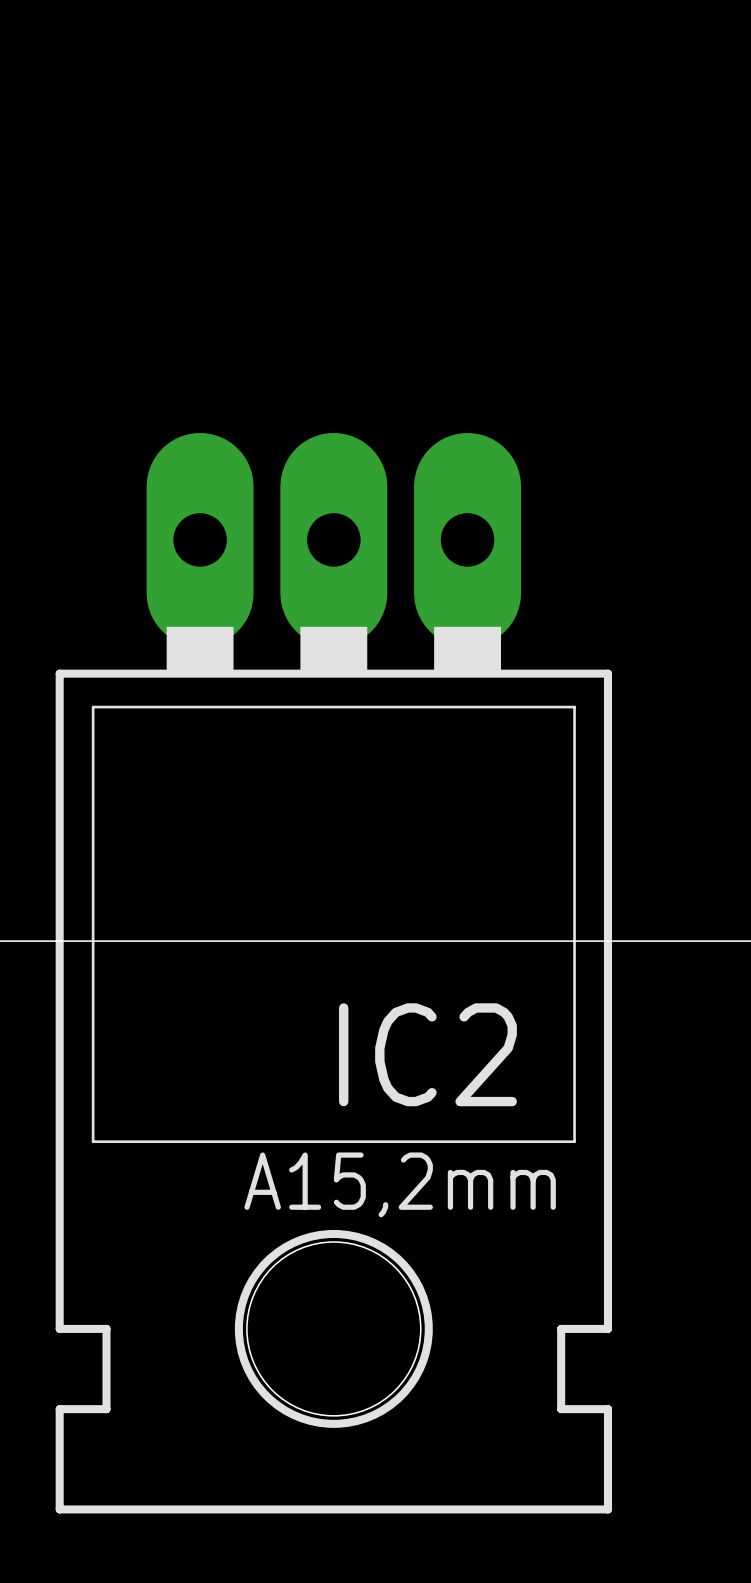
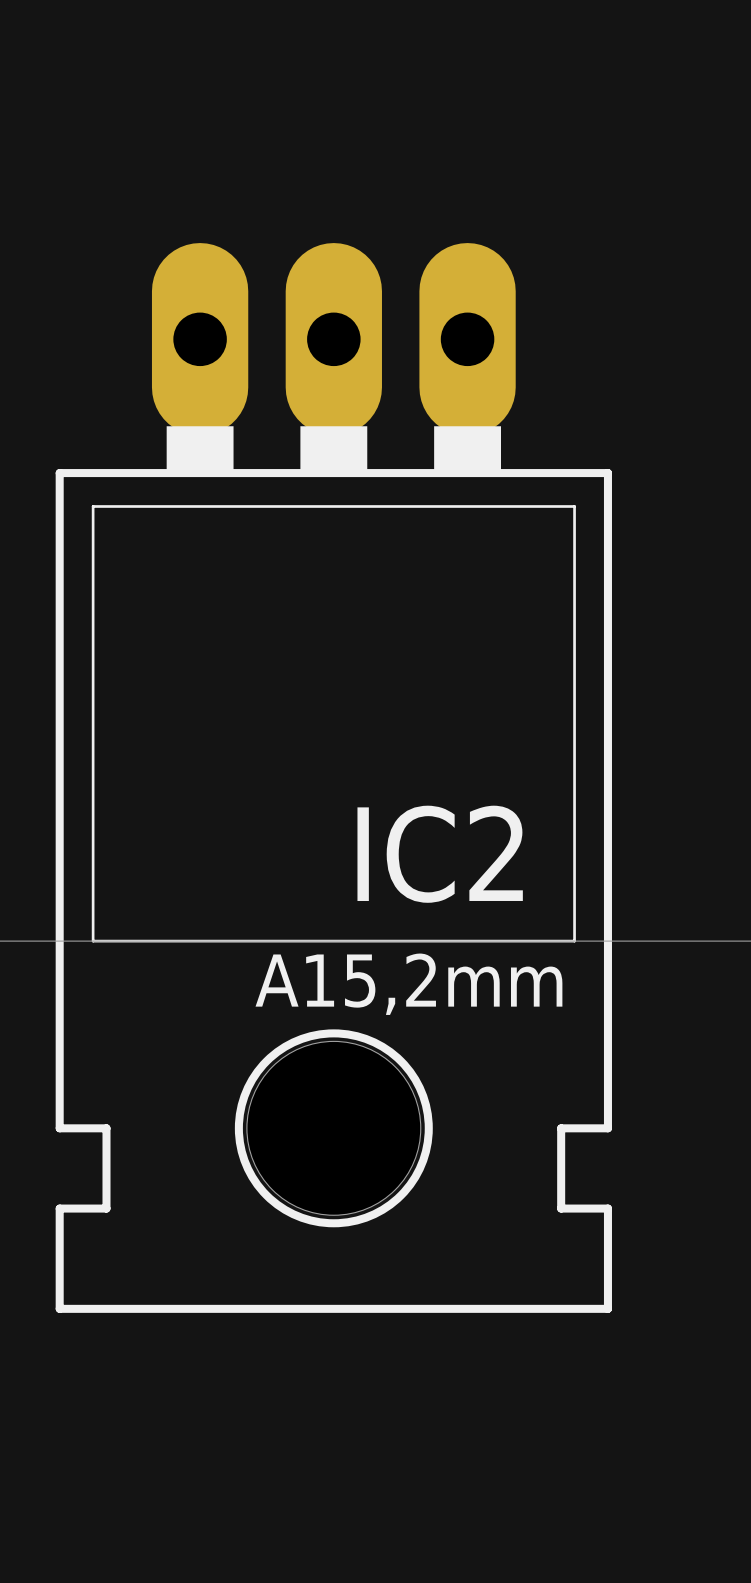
IC2 footprint: [55, 432, 612, 1514] -> [55, 243, 612, 1313]

